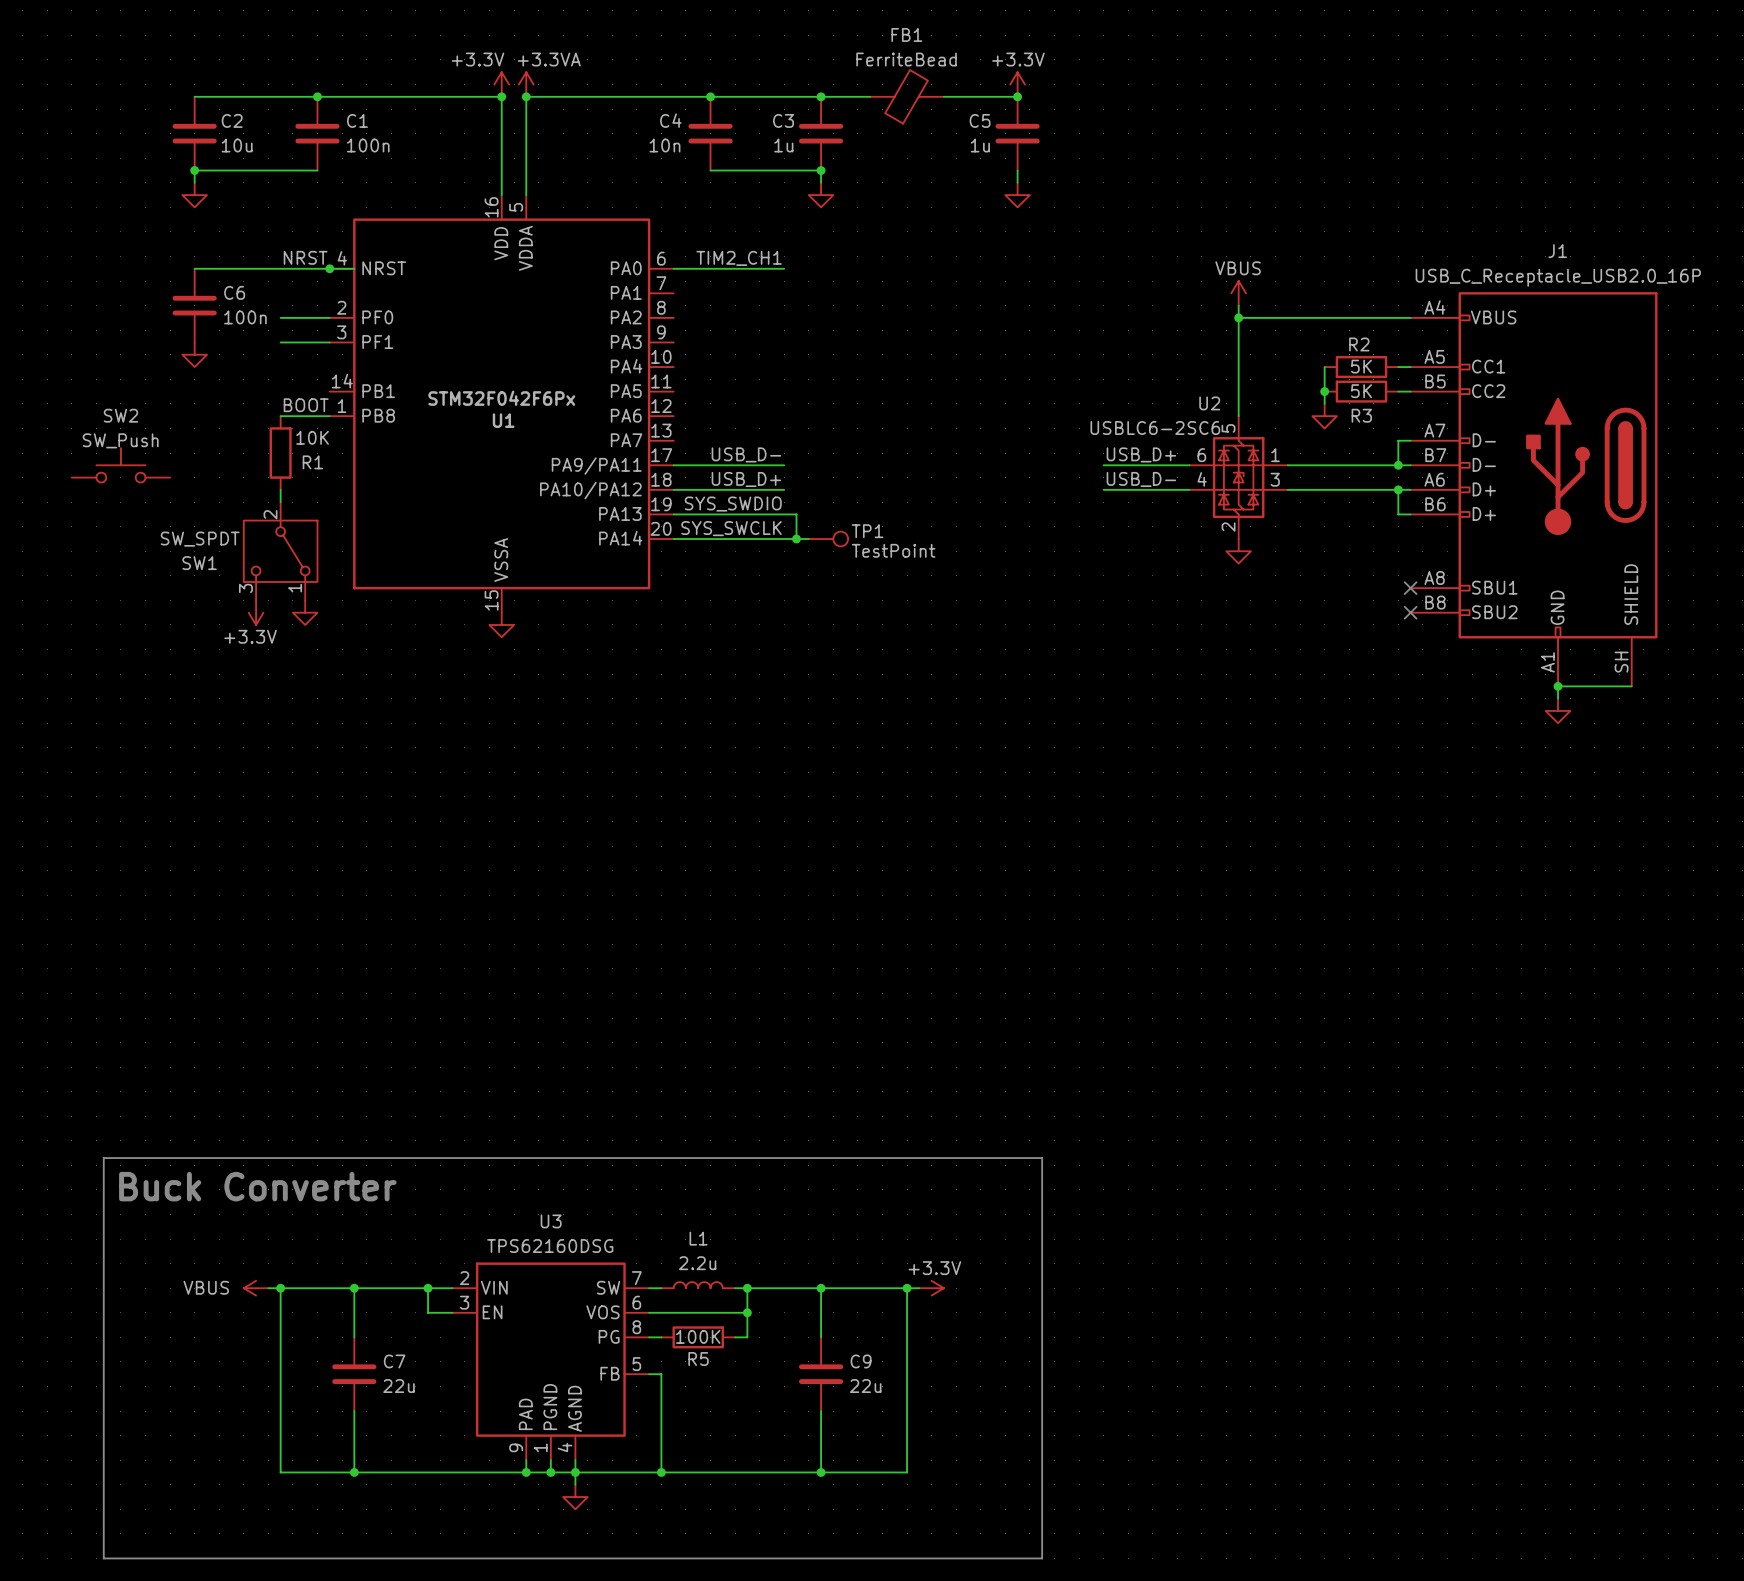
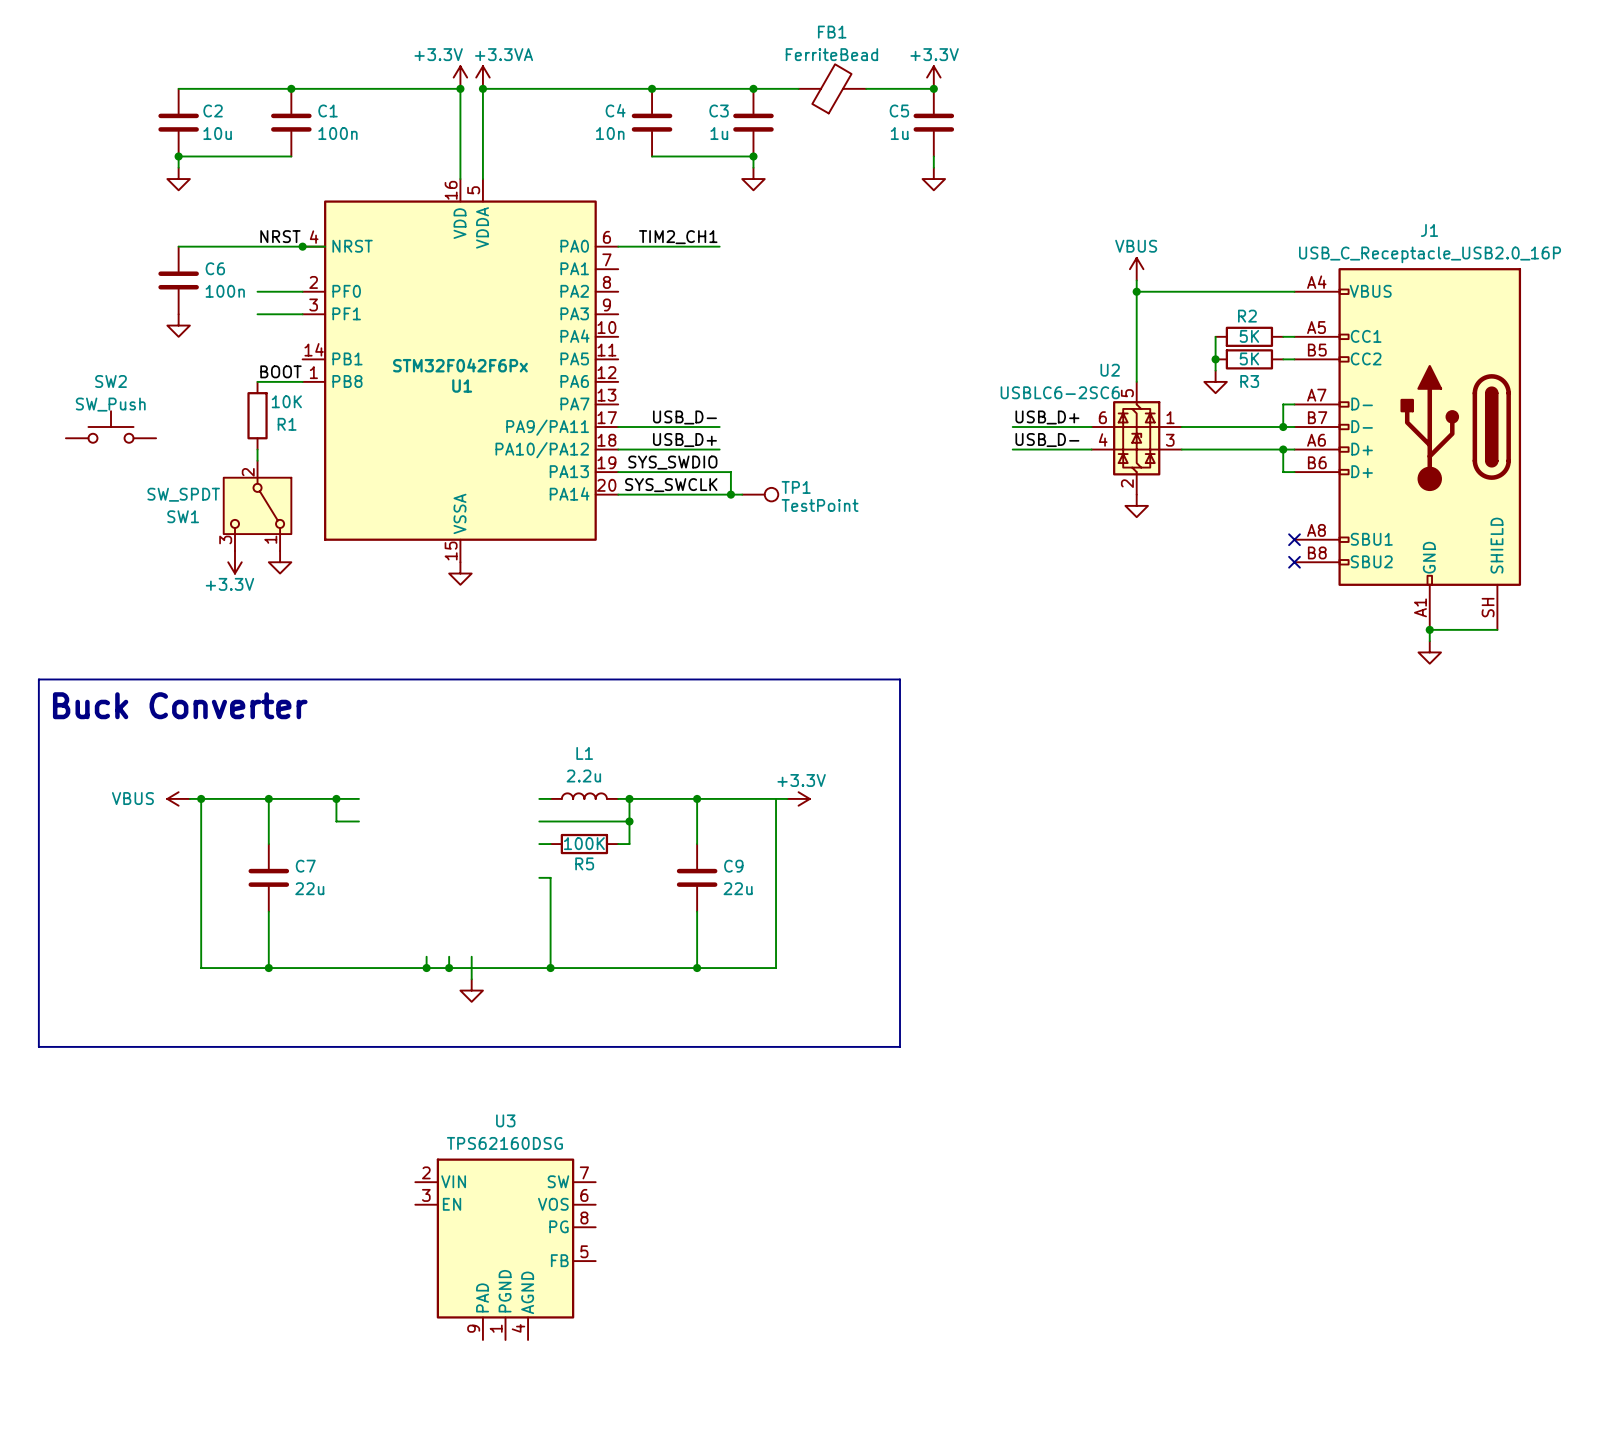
line: none -> (38, 679) (900, 679) (900, 1046) (38, 1046) (38, 679)
text: none -> Buck Converter (180, 705)
power symbol: none -> VBUS (178, 798)
wire: none -> (189, 798) (358, 798)
wire: none -> (201, 798) (201, 968) (776, 968) (776, 798)
junction: none -> (201, 798)
wire: none -> (268, 798) (268, 844)
junction: none -> (268, 798)
wire: none -> (336, 798) (336, 821) (358, 821)
junction: none -> (336, 798)
wire: none -> (539, 798) (550, 798)
wire: none -> (618, 798) (787, 798)
wire: none -> (629, 798) (629, 844) (618, 844)
junction: none -> (629, 798)
wire: none -> (697, 798) (697, 844)
junction: none -> (697, 798)
power symbol: none -> +3.3V (798, 798)
wire: none -> (539, 821) (629, 821)
junction: none -> (629, 821)
wire: none -> (539, 844) (550, 844)
wire: none -> (539, 877) (550, 877) (550, 968)
wire: none -> (268, 911) (268, 968)
wire: none -> (697, 911) (697, 968)
wire: none -> (426, 956) (426, 968)
wire: none -> (449, 956) (449, 968)
wire: none -> (471, 956) (471, 979)
junction: none -> (268, 968)
junction: none -> (426, 968)
junction: none -> (449, 968)
junction: none -> (550, 968)
junction: none -> (697, 968)
power symbol: none -> (471, 990)
line: (103, 1158) (1042, 1158) (1042, 1558) (103, 1558) (103, 1158) -> none
text: Buck Converter (257, 1186) -> none
L1 position: (698, 1285) -> (584, 796)
power symbol: VBUS (256, 1288) -> none
wire: (268, 1288) (452, 1288) -> none
wire: (280, 1288) (280, 1472) (907, 1472) (907, 1288) -> none
junction: (280, 1288) -> none
wire: (354, 1288) (354, 1337) -> none
junction: (354, 1288) -> none
wire: (428, 1288) (428, 1312) (452, 1312) -> none
junction: (428, 1288) -> none
wire: (649, 1288) (661, 1288) -> none
wire: (735, 1288) (919, 1288) -> none
wire: (747, 1288) (747, 1337) (735, 1337) -> none
junction: (747, 1288) -> none
wire: (821, 1288) (821, 1337) -> none
junction: (821, 1288) -> none
junction: (907, 1288) -> none
power symbol: +3.3V (931, 1288) -> none
wire: (649, 1312) (747, 1312) -> none
junction: (747, 1312) -> none
wire: (649, 1337) (661, 1337) -> none
R5 position: (698, 1337) -> (584, 844)
C7 position: (354, 1374) -> (268, 877)
wire: (649, 1374) (661, 1374) (661, 1472) -> none
C9 position: (821, 1374) -> (697, 877)
wire: (354, 1411) (354, 1472) -> none
wire: (821, 1411) (821, 1472) -> none
wire: (526, 1460) (526, 1472) -> none
wire: (550, 1460) (550, 1472) -> none
wire: (575, 1460) (575, 1484) -> none
junction: (354, 1472) -> none
junction: (526, 1472) -> none
junction: (550, 1472) -> none
junction: (575, 1472) -> none
junction: (661, 1472) -> none
junction: (821, 1472) -> none
power symbol: (575, 1497) -> none

